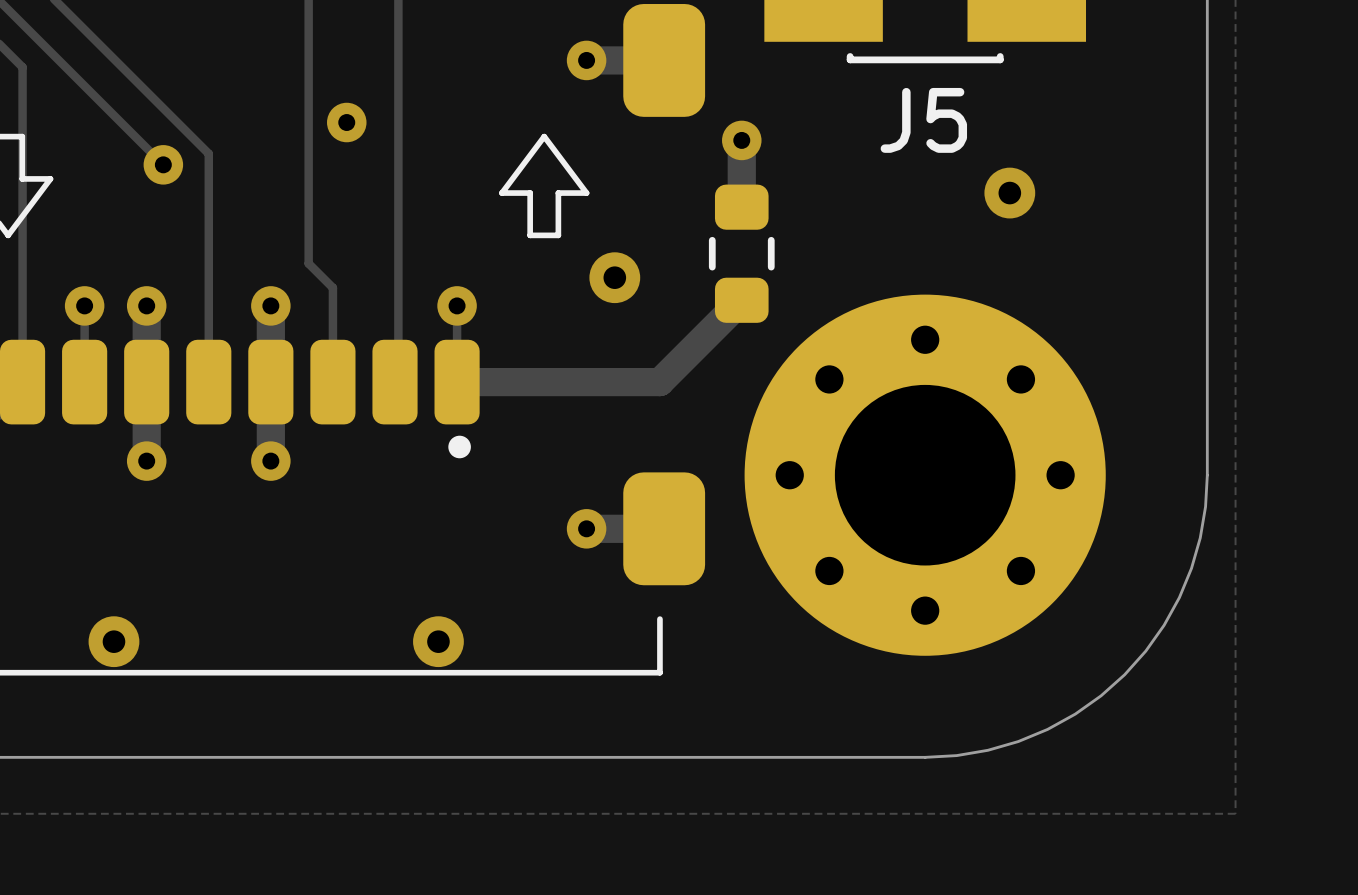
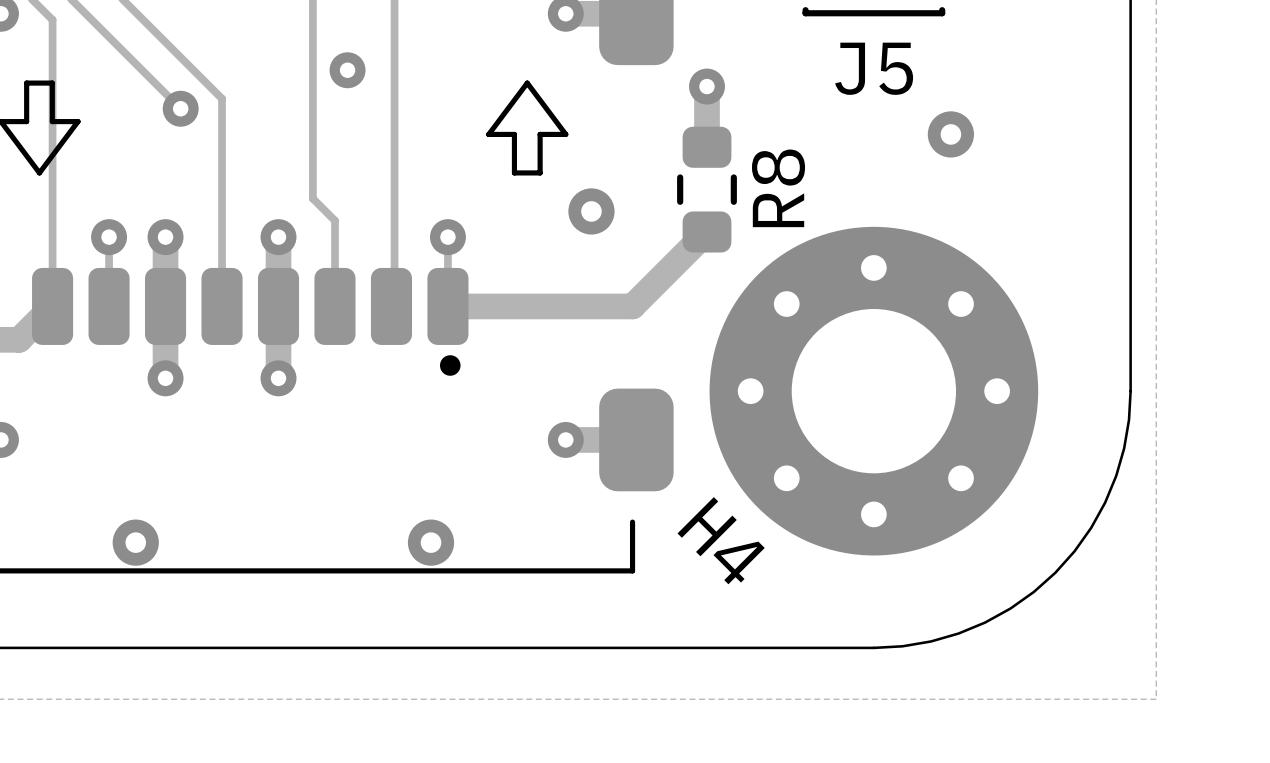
R8 name: none -> R8 (778, 188)
H4 name: none -> H4 (721, 540)

